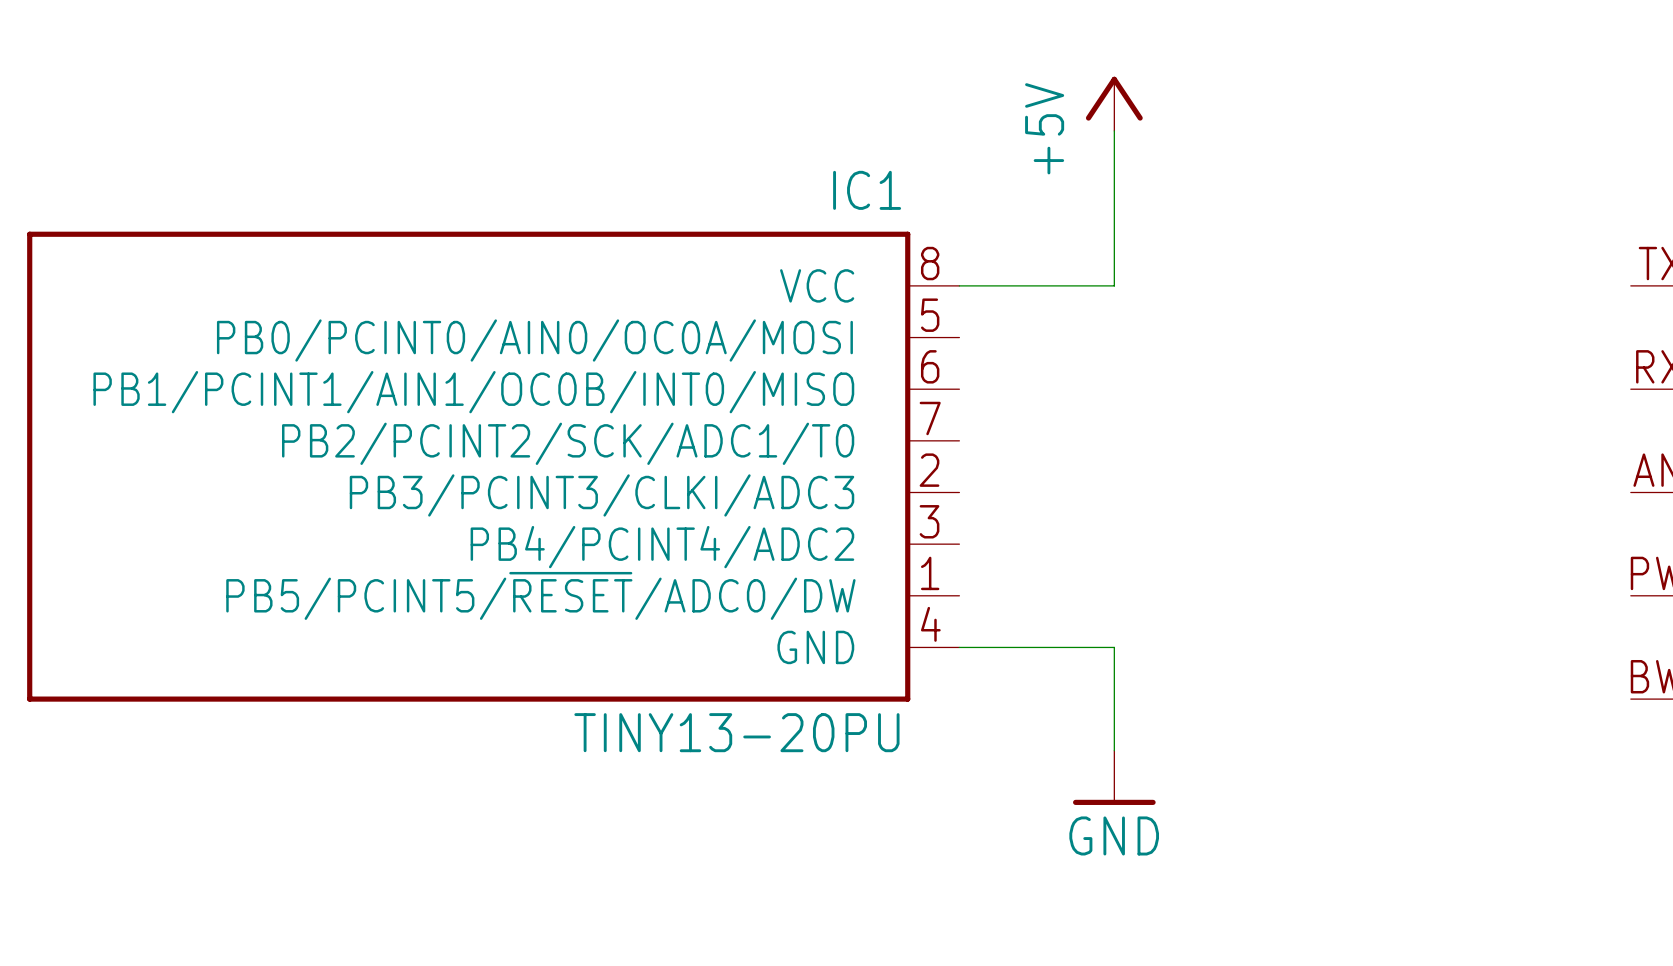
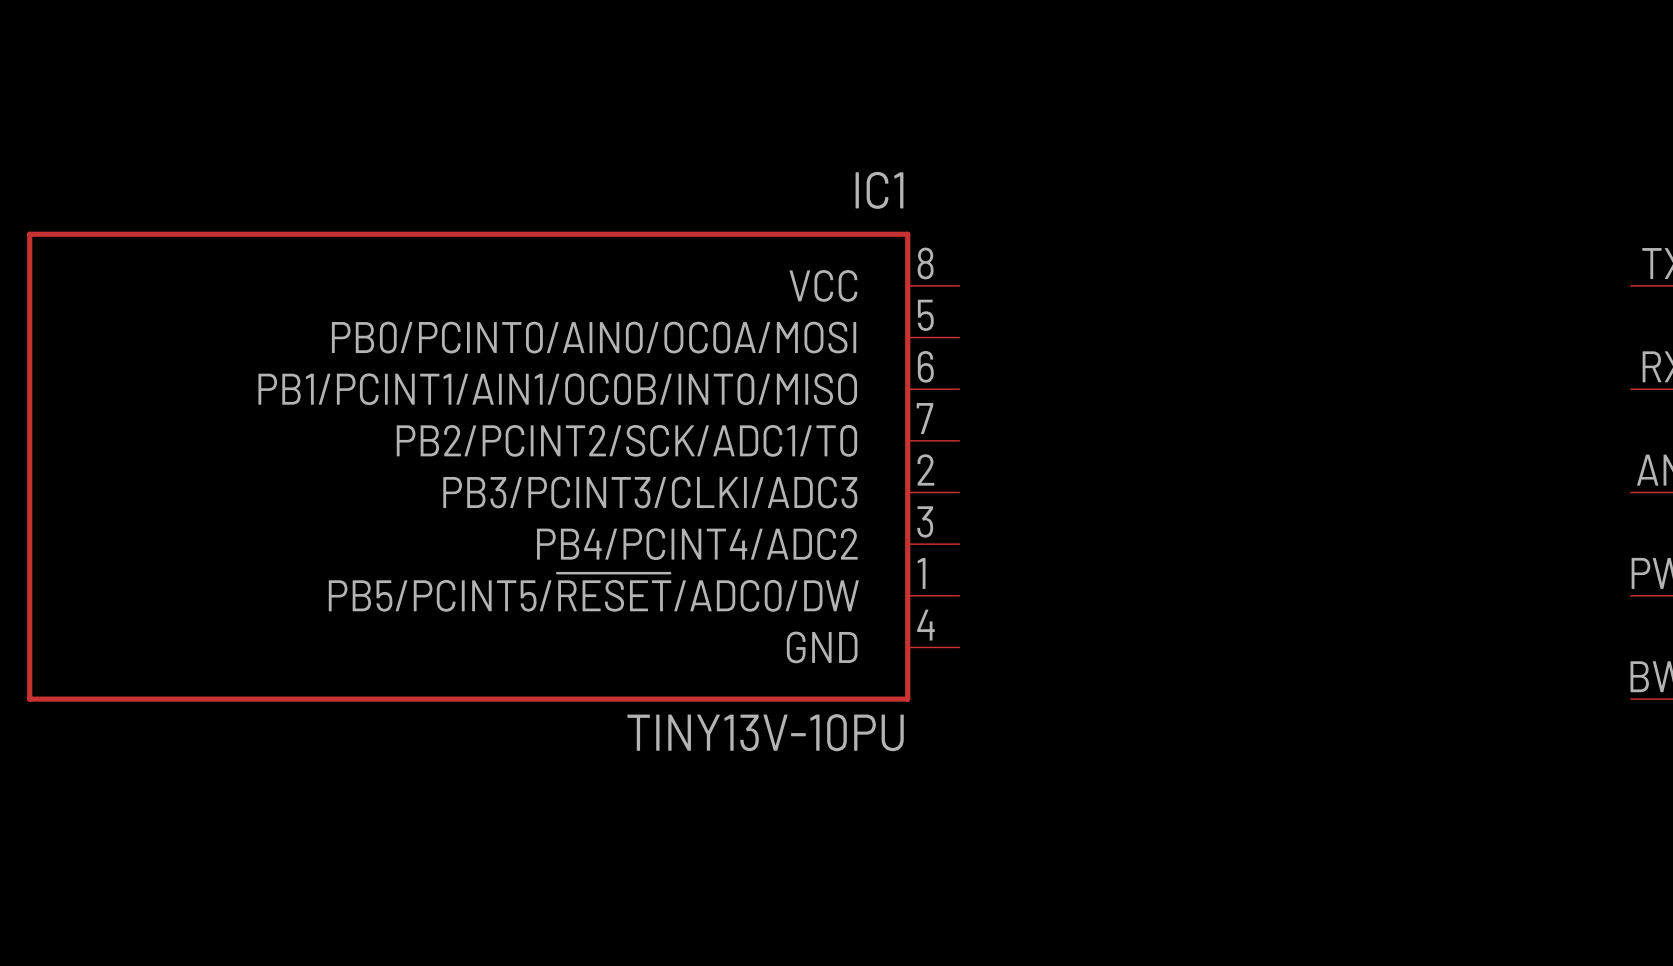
power symbol: +5V (1114, 103) -> none
wire: (1114, 130) (1114, 285) (959, 285) -> none
wire: (959, 647) (1114, 647) (1114, 750) -> none
IC1 value: TINY13-20PU (736, 732) -> TINY13V-10PU (765, 732)
power symbol: GND (1114, 777) -> none

